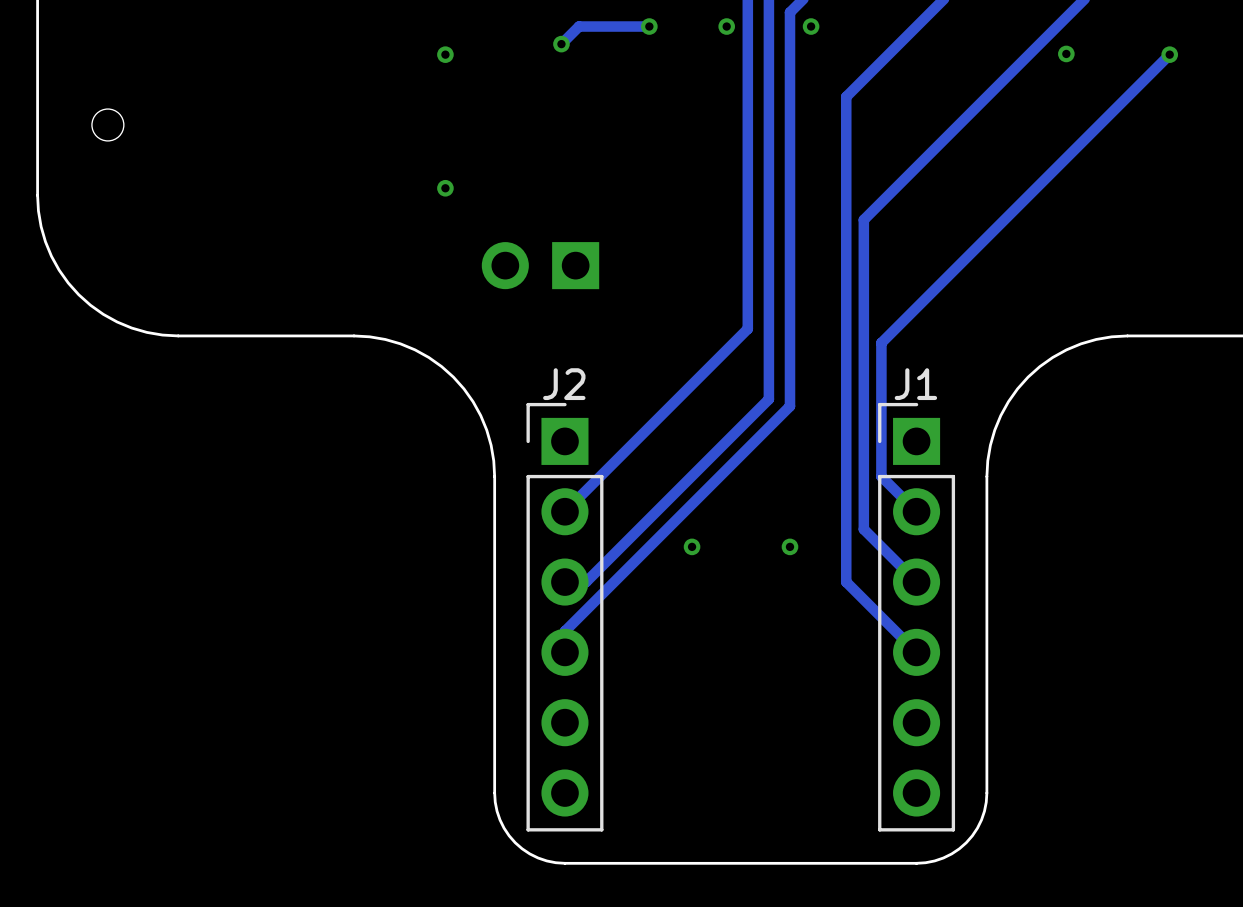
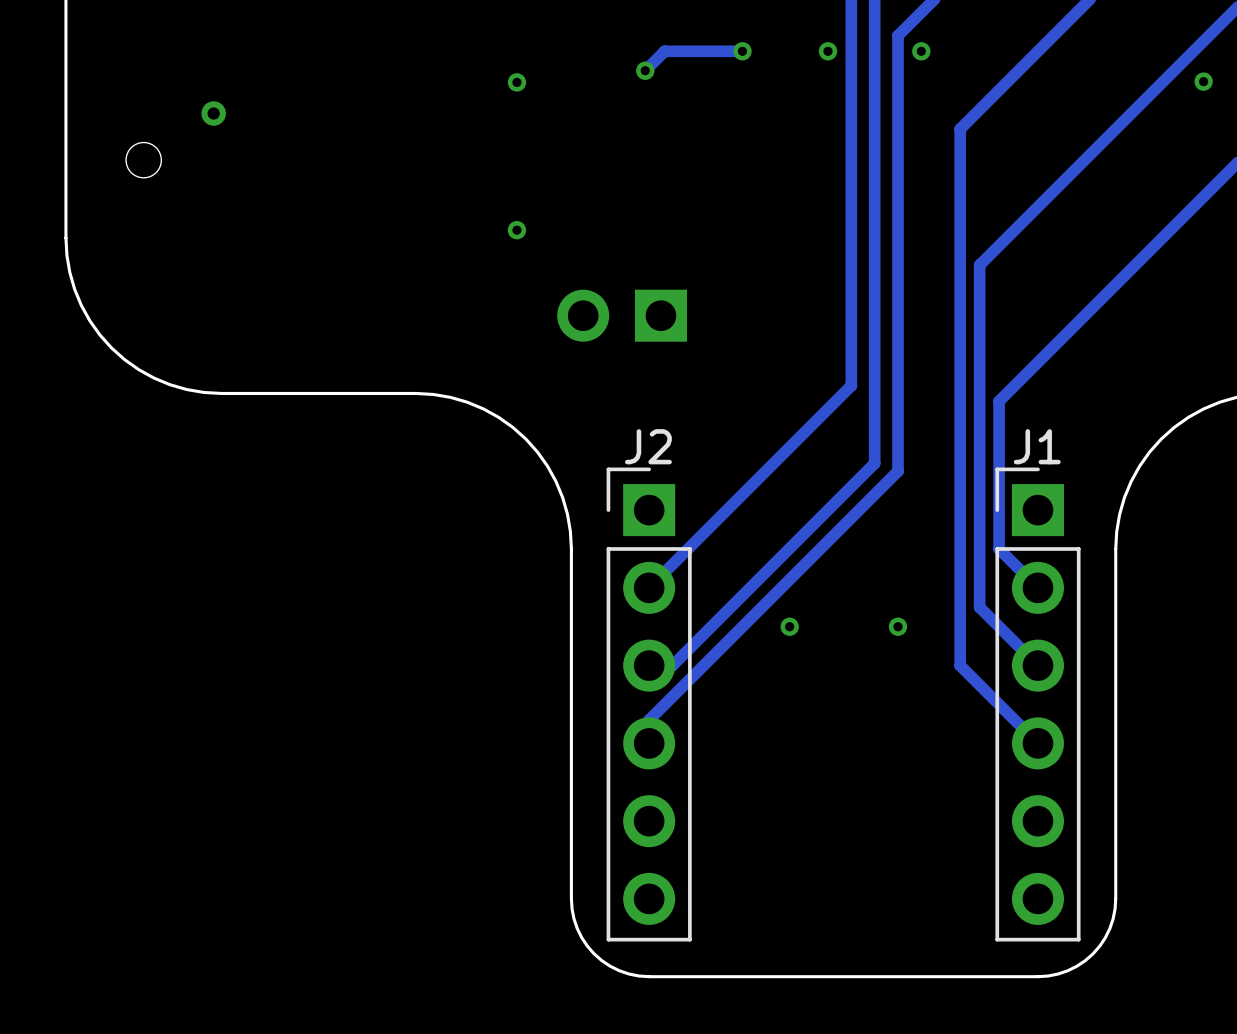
via: none -> (213, 113)

